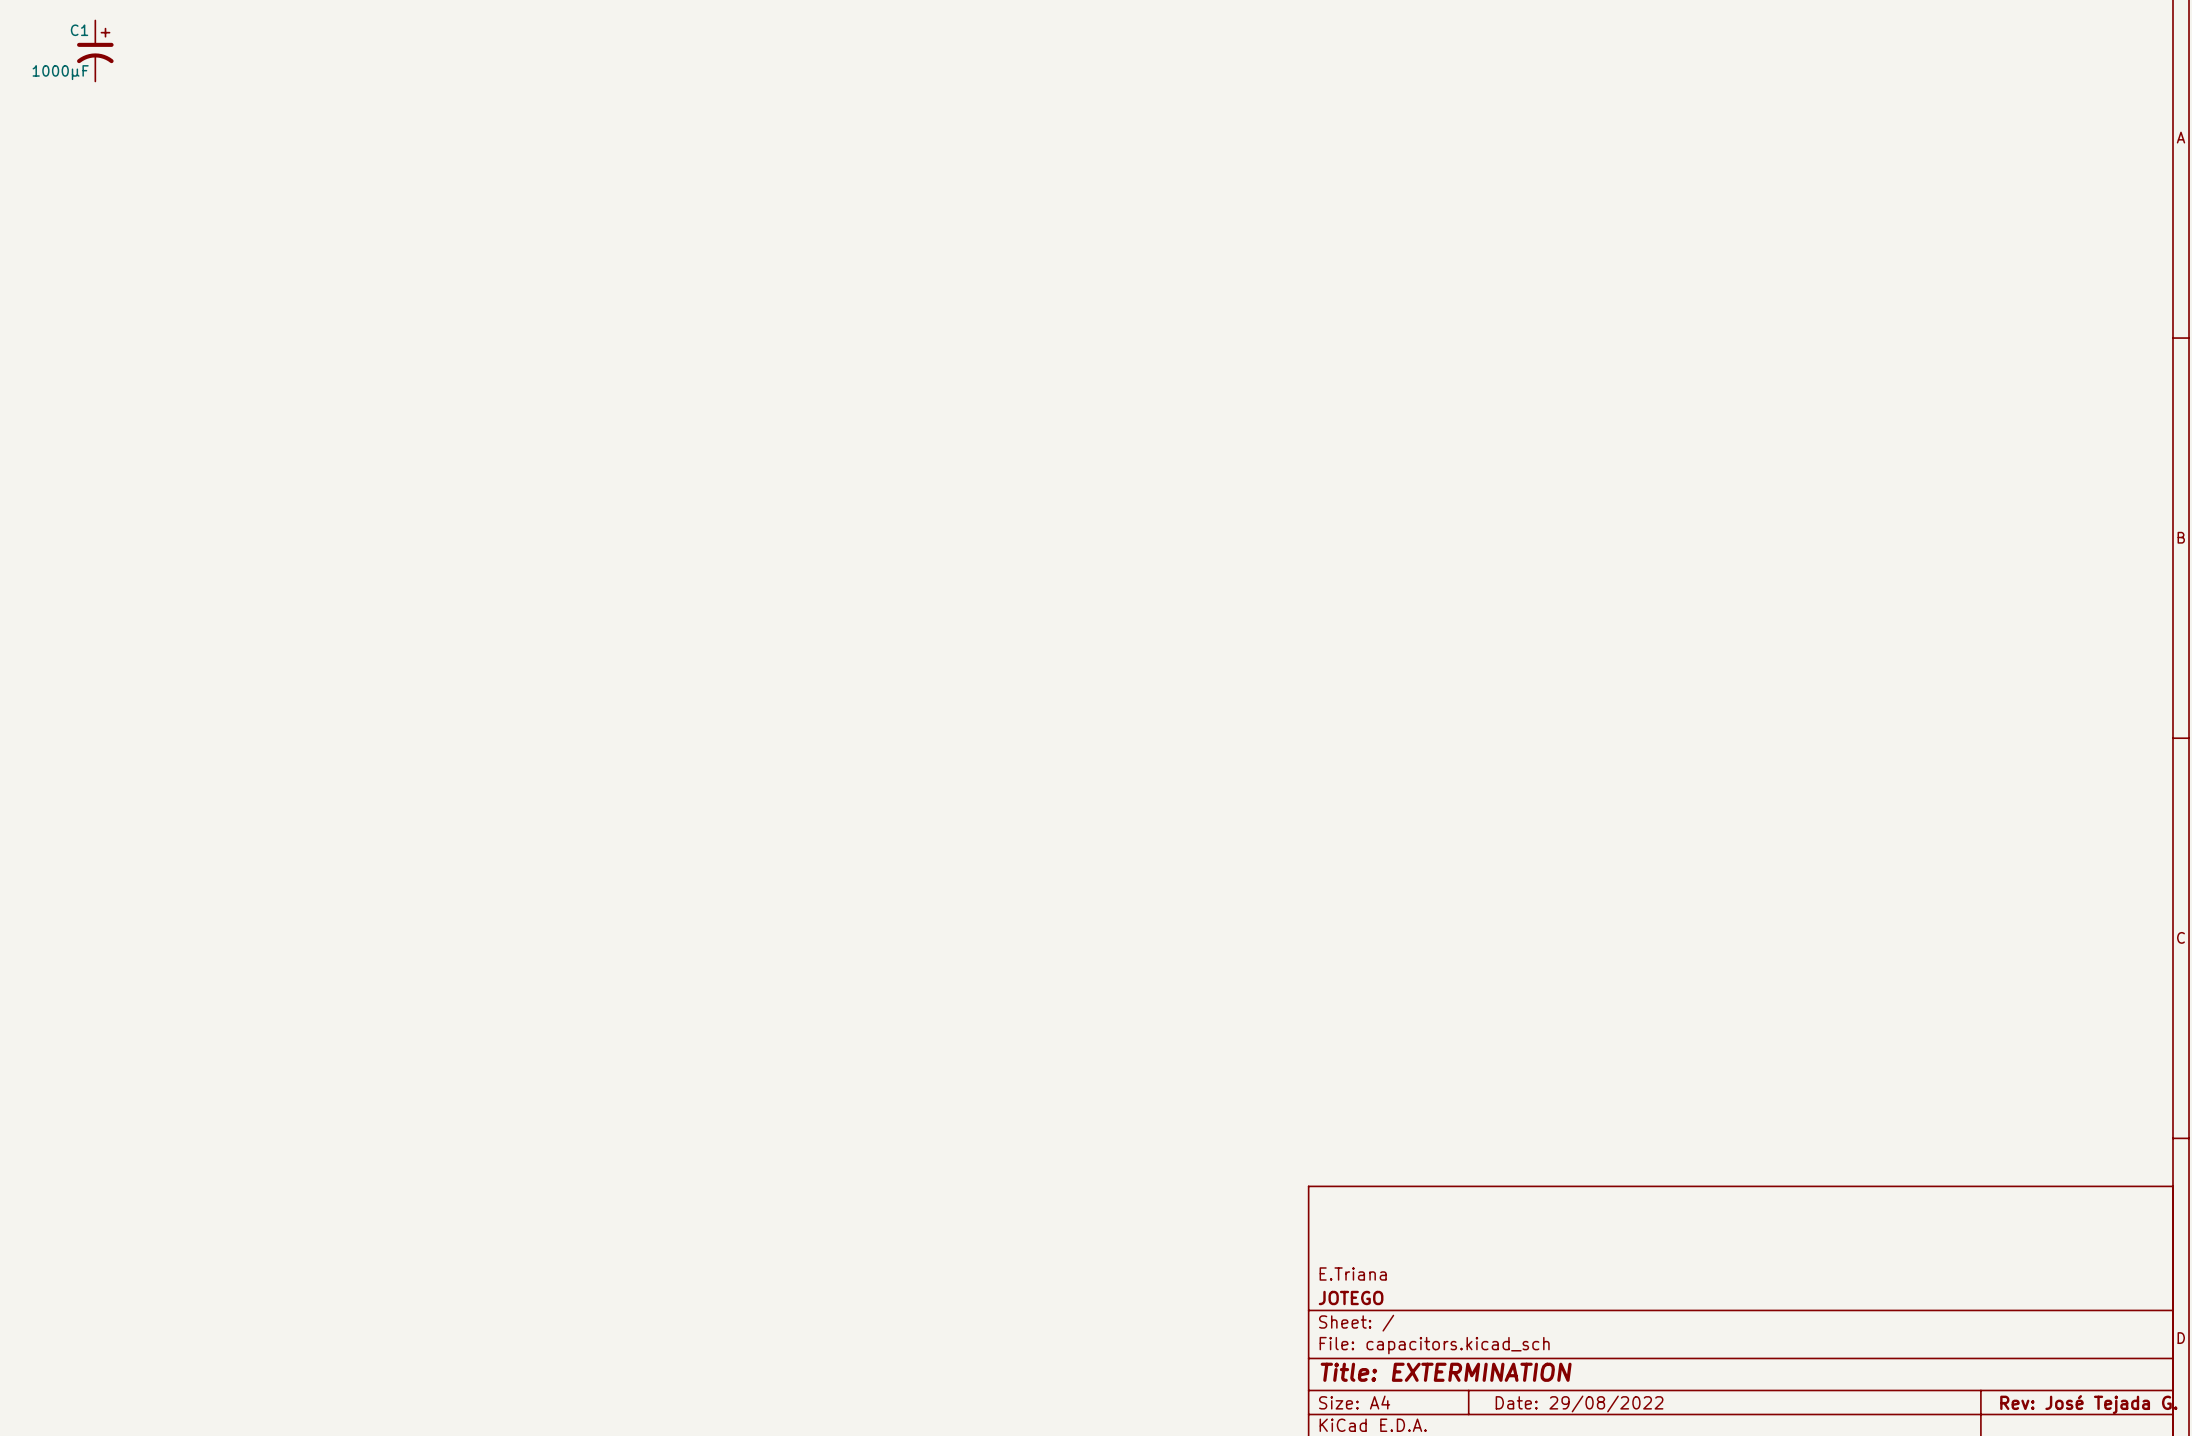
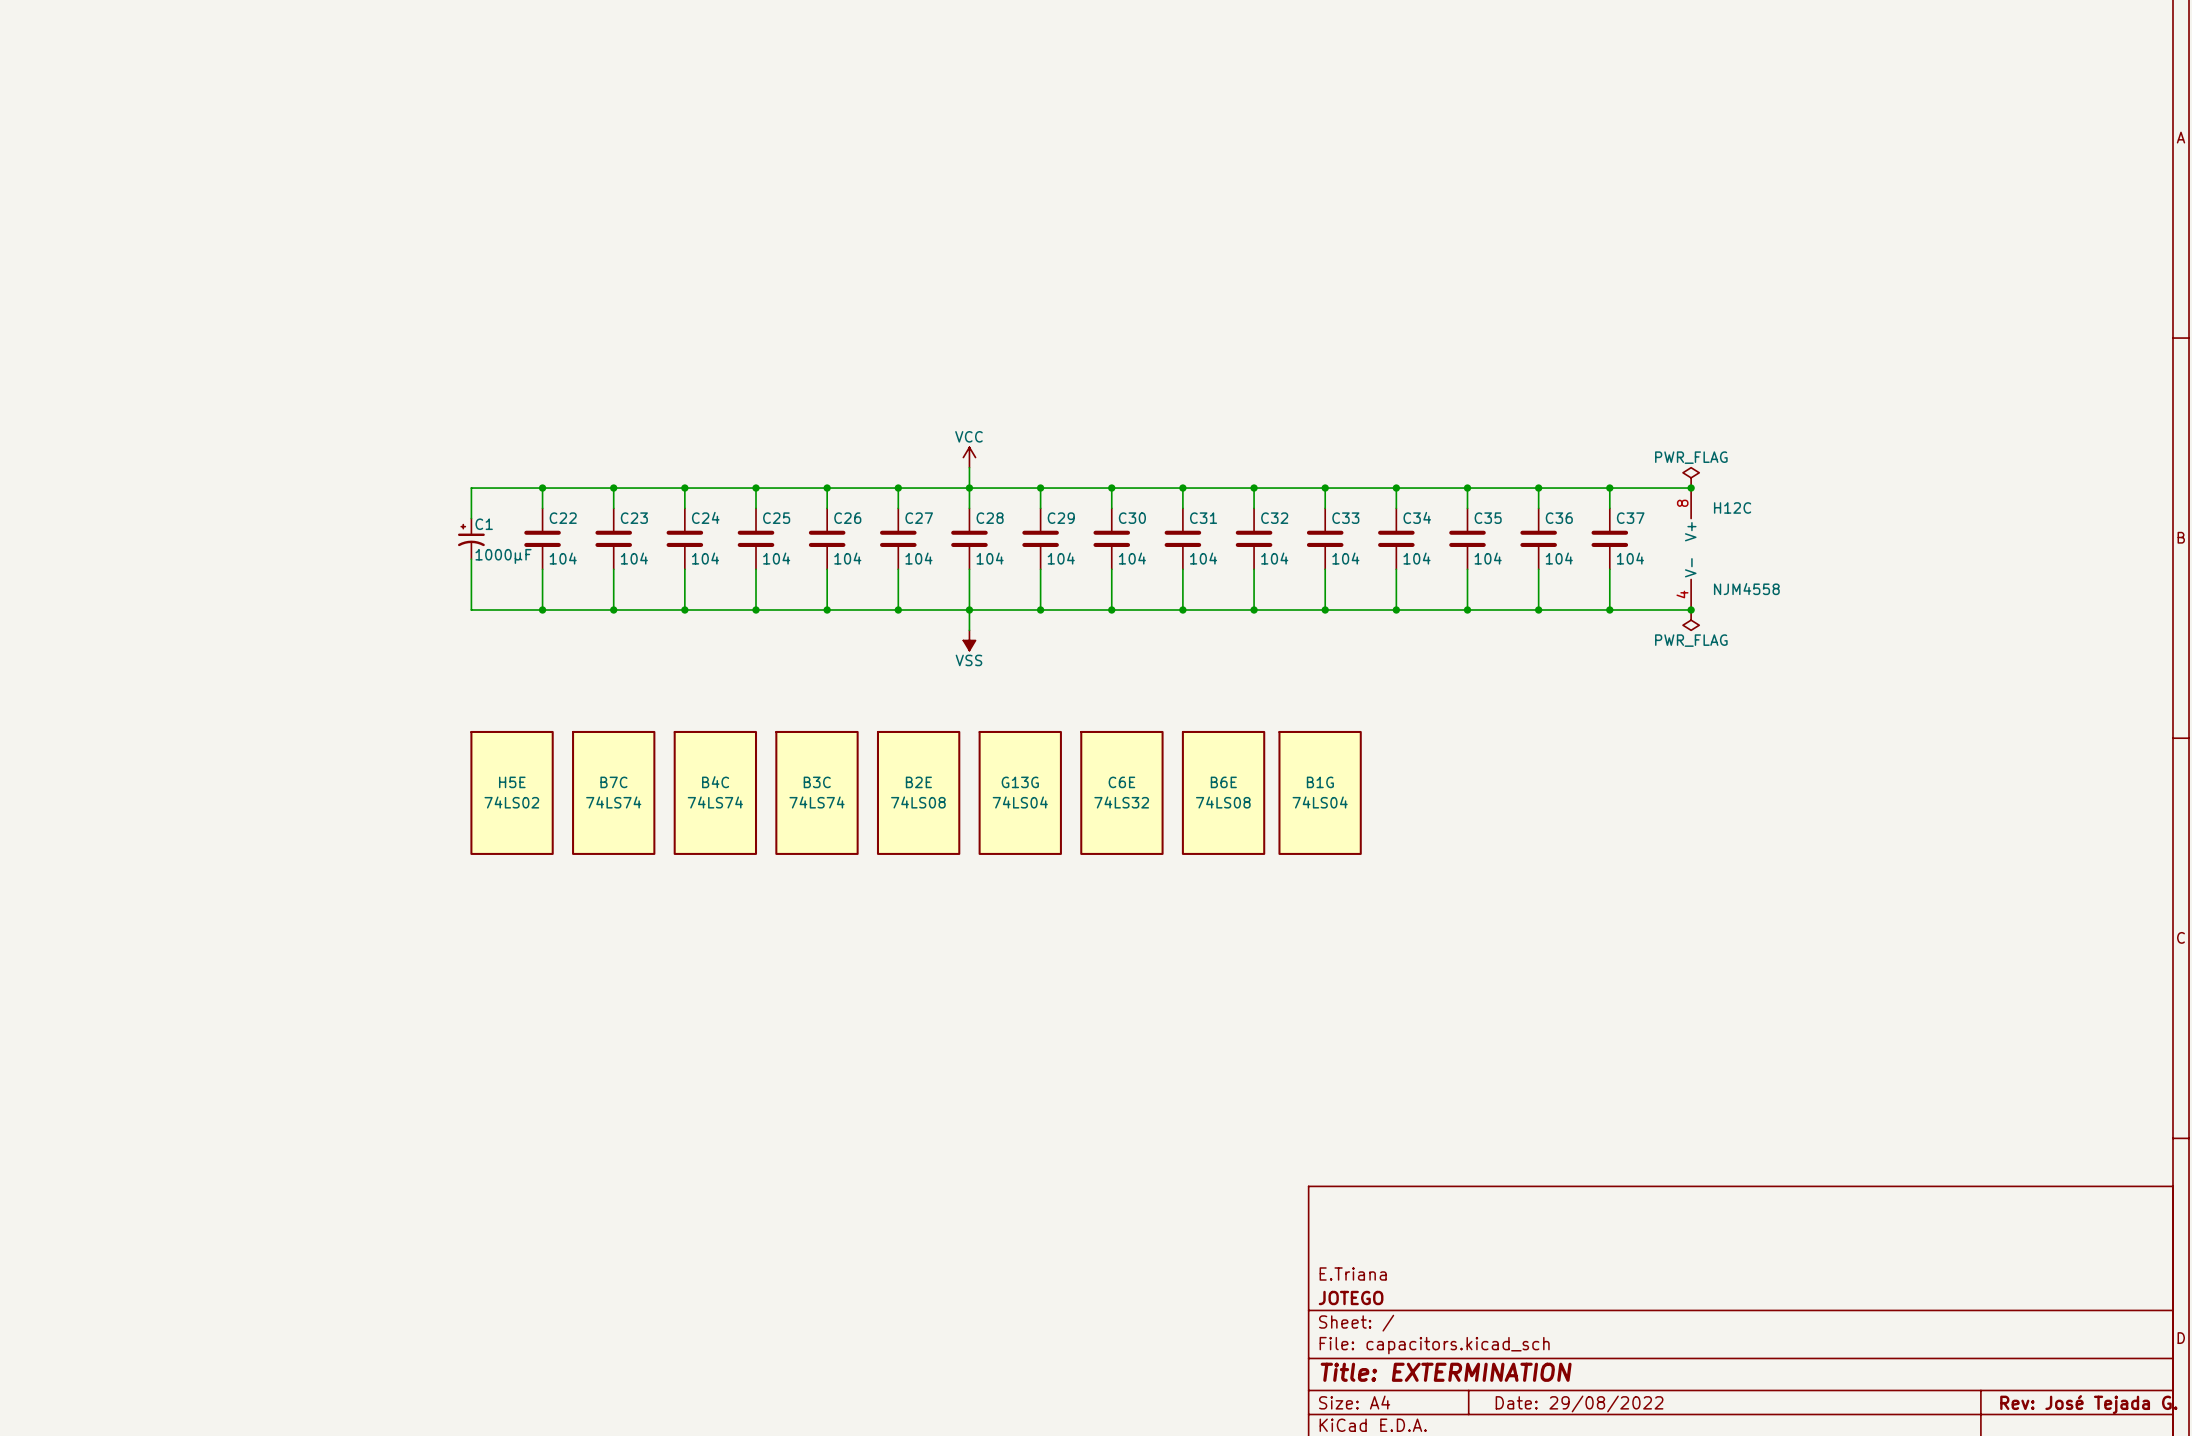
C1 symbol: [77, 20, 114, 82] -> [457, 518, 485, 560]
C1 name position: C1 (79, 30) -> C1 (484, 524)
C1 value position: 1000μF (60, 72) -> 1000μF (503, 556)
power symbol: none -> VCC (969, 457)
wire: none -> (969, 467) (969, 508)
power symbol: none -> PWR_FLAG (1691, 477)
wire: none -> (542, 488) (542, 508)
junction: none -> (542, 488)
wire: none -> (613, 488) (613, 508)
junction: none -> (613, 488)
wire: none -> (684, 488) (684, 508)
junction: none -> (684, 488)
wire: none -> (756, 488) (756, 508)
junction: none -> (756, 488)
wire: none -> (827, 488) (827, 508)
junction: none -> (827, 488)
wire: none -> (898, 488) (898, 508)
junction: none -> (898, 488)
junction: none -> (969, 488)
wire: none -> (1040, 488) (1040, 508)
junction: none -> (1040, 488)
wire: none -> (1111, 488) (1111, 508)
junction: none -> (1111, 488)
wire: none -> (1182, 488) (1182, 508)
junction: none -> (1182, 488)
wire: none -> (1254, 488) (1254, 508)
junction: none -> (1254, 488)
wire: none -> (1325, 488) (1325, 508)
junction: none -> (1325, 488)
wire: none -> (1396, 488) (1396, 508)
junction: none -> (1396, 488)
wire: none -> (1467, 488) (1467, 508)
junction: none -> (1467, 488)
wire: none -> (1538, 488) (1538, 508)
junction: none -> (1538, 488)
wire: none -> (1609, 488) (1609, 508)
junction: none -> (1609, 488)
wire: none -> (1691, 488) (471, 488) (471, 518)
junction: none -> (1691, 488)
C22: none -> 104 (542, 538)
C23: none -> 104 (613, 538)
C24: none -> 104 (684, 538)
C25: none -> 104 (756, 538)
C26: none -> 104 (827, 538)
C27: none -> 104 (898, 538)
C28: none -> 104 (969, 538)
C29: none -> 104 (1040, 538)
C30: none -> 104 (1111, 538)
C31: none -> 104 (1182, 538)
C32: none -> 104 (1254, 538)
C33: none -> 104 (1325, 538)
C34: none -> 104 (1396, 538)
C35: none -> 104 (1467, 538)
C36: none -> 104 (1538, 538)
C37: none -> 104 (1609, 538)
H12C: none -> NJM4558 (1691, 549)
wire: none -> (471, 559) (471, 610) (1691, 610)
wire: none -> (542, 569) (542, 610)
wire: none -> (613, 569) (613, 610)
wire: none -> (684, 569) (684, 610)
wire: none -> (756, 569) (756, 610)
wire: none -> (827, 569) (827, 610)
wire: none -> (898, 569) (898, 610)
wire: none -> (969, 569) (969, 630)
wire: none -> (1040, 569) (1040, 610)
wire: none -> (1111, 569) (1111, 610)
wire: none -> (1182, 569) (1182, 610)
wire: none -> (1254, 569) (1254, 610)
wire: none -> (1325, 569) (1325, 610)
wire: none -> (1396, 569) (1396, 610)
wire: none -> (1467, 569) (1467, 610)
wire: none -> (1538, 569) (1538, 610)
wire: none -> (1609, 569) (1609, 610)
junction: none -> (542, 610)
junction: none -> (613, 610)
junction: none -> (684, 610)
junction: none -> (756, 610)
junction: none -> (827, 610)
junction: none -> (898, 610)
junction: none -> (969, 610)
junction: none -> (1040, 610)
junction: none -> (1111, 610)
junction: none -> (1182, 610)
junction: none -> (1254, 610)
junction: none -> (1325, 610)
junction: none -> (1396, 610)
junction: none -> (1467, 610)
junction: none -> (1538, 610)
junction: none -> (1609, 610)
junction: none -> (1691, 610)
power symbol: none -> PWR_FLAG (1691, 620)
power symbol: none -> VSS (969, 640)
H5E: none -> 74LS02 (512, 792)
B7C: none -> 74LS74 (613, 792)
B4C: none -> 74LS74 (715, 792)
B3C: none -> 74LS74 (816, 792)
B2E: none -> 74LS08 (918, 792)
G13G: none -> 74LS04 (1020, 792)
C6E: none -> 74LS32 (1121, 792)
B6E: none -> 74LS08 (1223, 792)
B1G: none -> 74LS04 (1320, 792)

